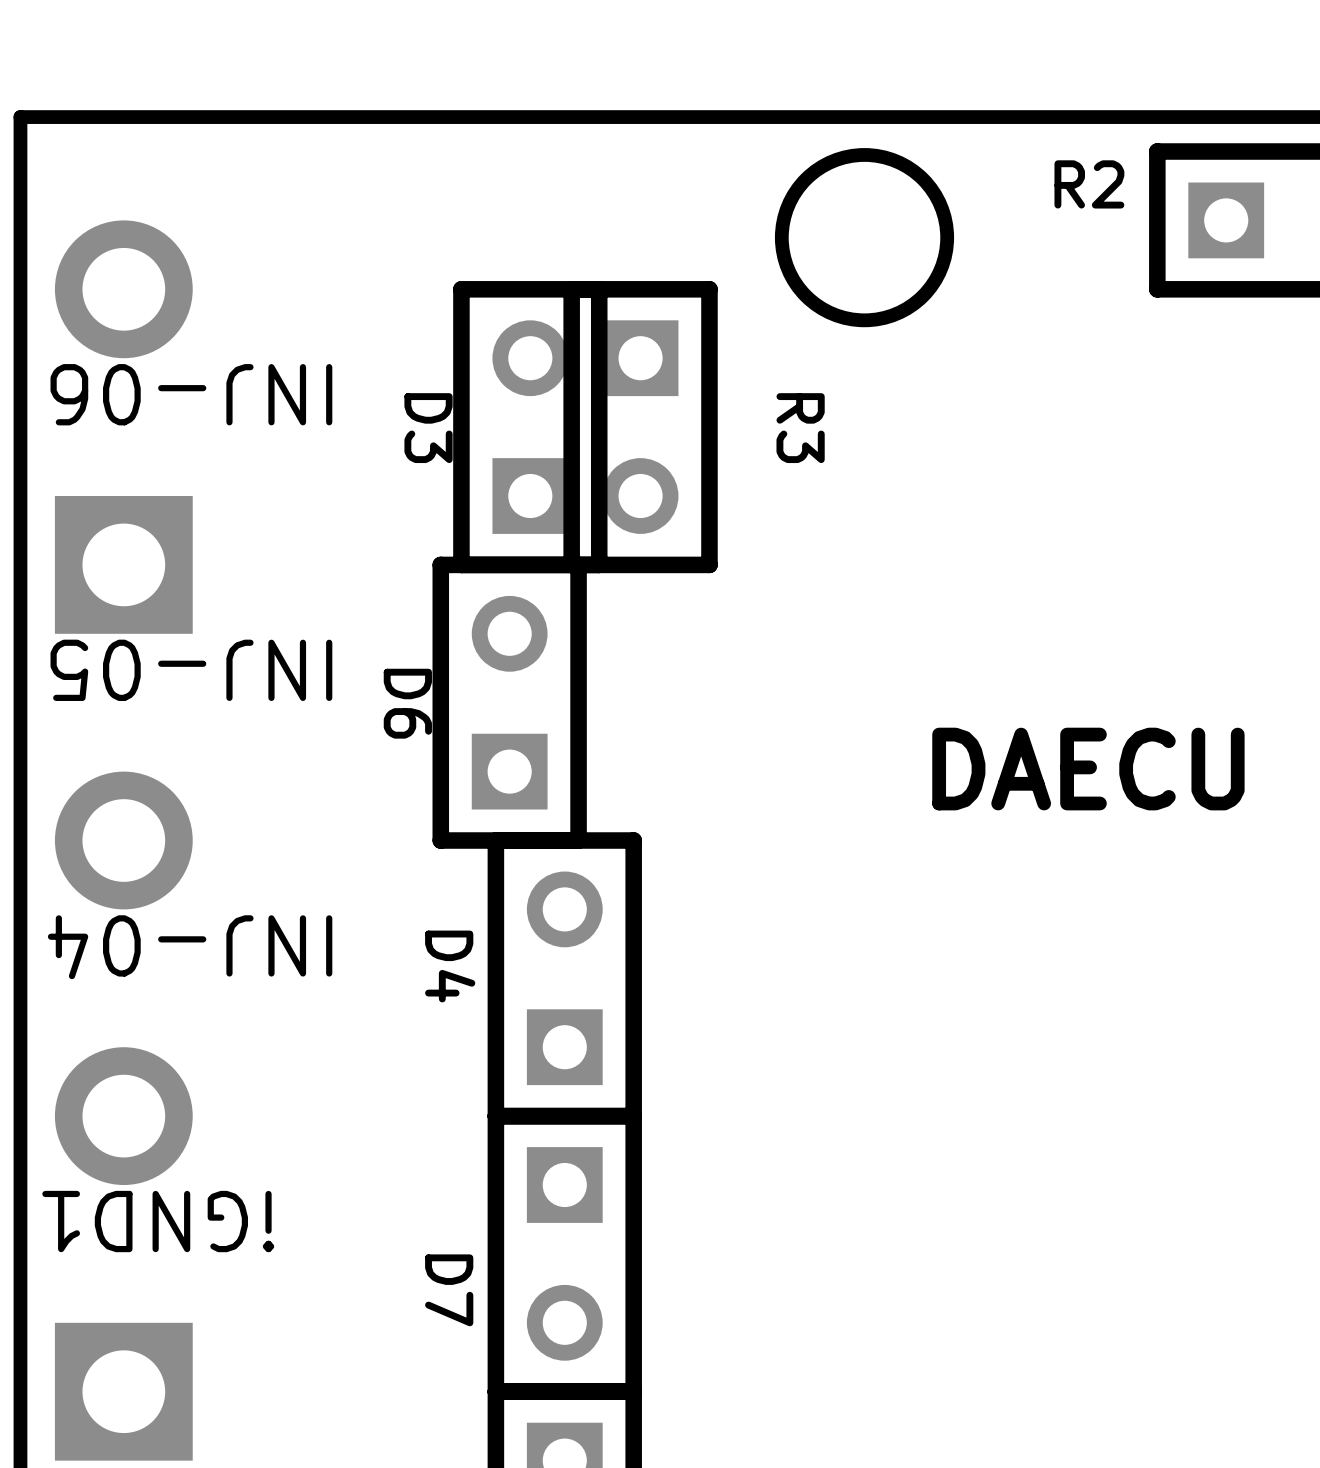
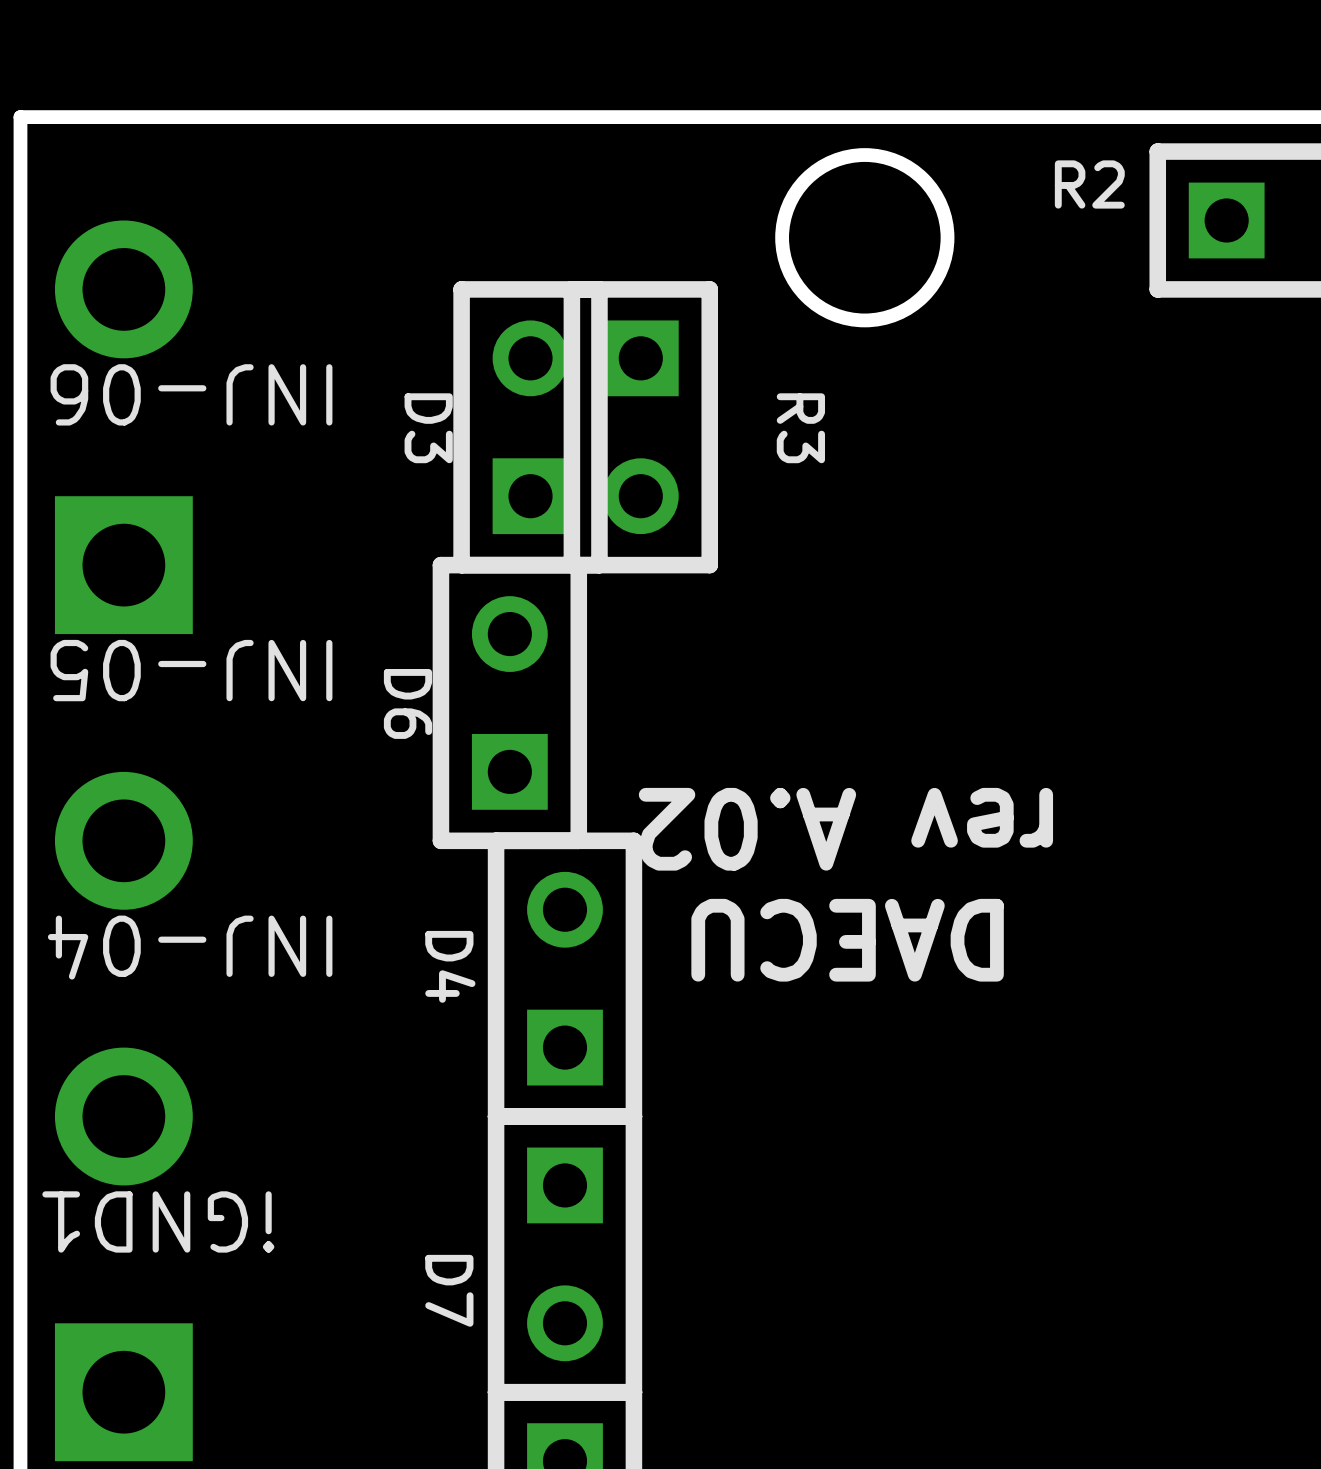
text rotation: 0° (1088, 769) -> 180° (847, 940)
text: none -> rev A.02 (845, 829)

